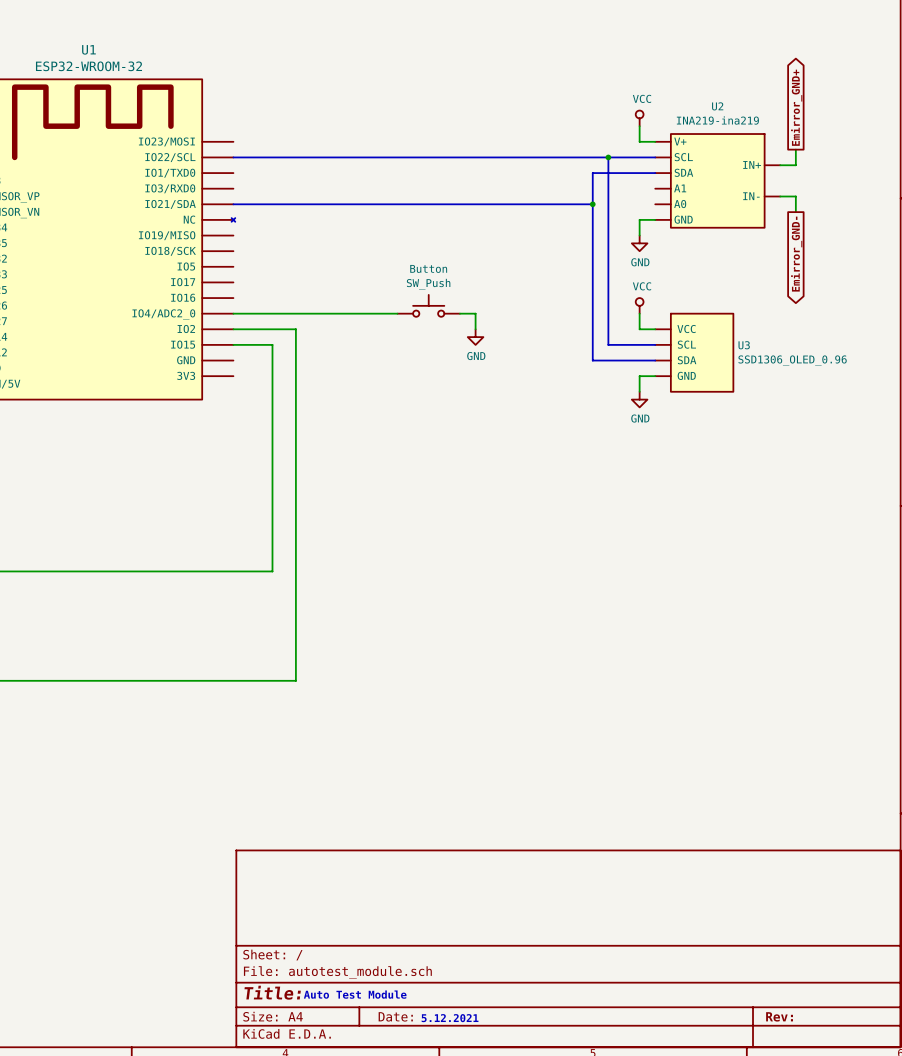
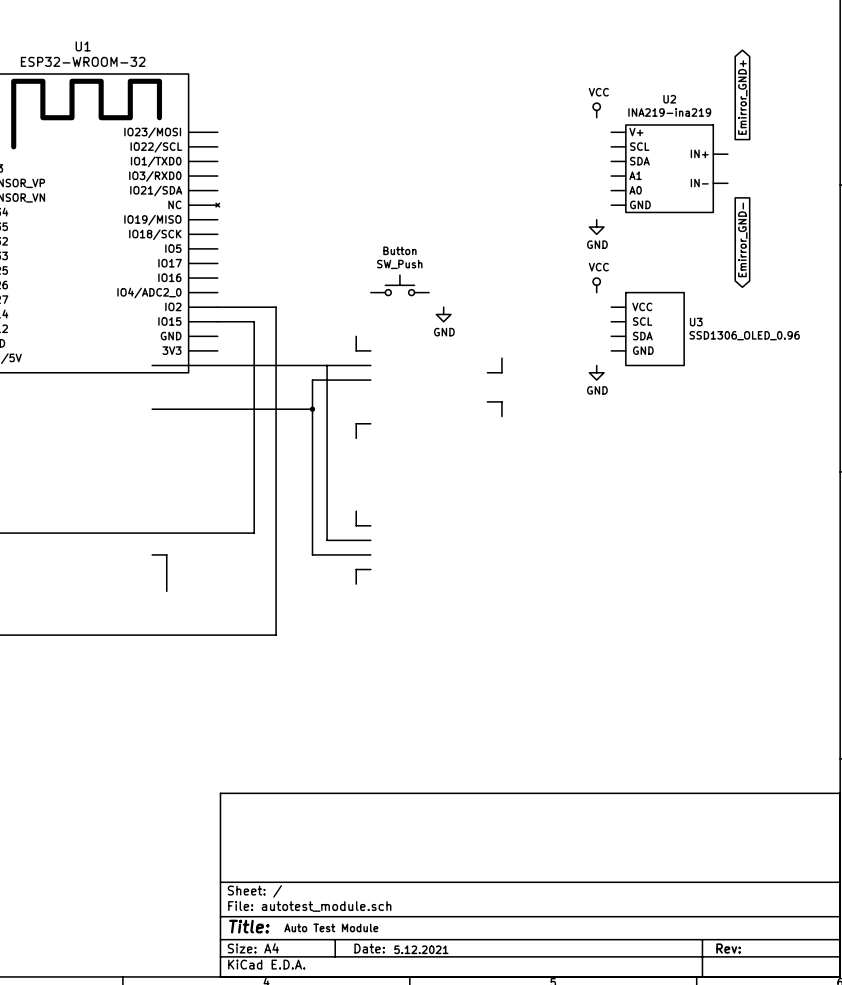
wire: (639, 126) (639, 141) (655, 141) -> none
wire: (795, 149) (795, 165) (780, 165) -> none
bus: (233, 157) (655, 157) -> none
bus: (608, 157) (608, 344) (655, 344) -> none
junction: (608, 157) -> none
bus: (655, 173) (592, 173) (592, 360) (655, 360) -> none
wire: (780, 196) (795, 196) (795, 212) -> none
bus: (233, 204) (592, 204) -> none
junction: (592, 204) -> none
wire: (655, 219) (639, 219) (639, 235) -> none
wire: (233, 313) (397, 313) -> none
wire: (459, 313) (475, 313) (475, 329) -> (487, 401) (501, 401) (501, 416)
wire: (639, 313) (639, 329) (655, 329) -> none
wire: none -> (356, 336) (356, 350) (370, 350)
wire: (655, 376) (639, 376) (639, 391) -> none
wire: none -> (501, 358) (501, 372) (487, 372)
bus: none -> (152, 365) (370, 365)
bus: none -> (327, 365) (327, 540) (370, 540)
bus: none -> (370, 380) (312, 380) (312, 554) (370, 554)
bus: none -> (152, 409) (312, 409)
junction: none -> (312, 409)
wire: none -> (370, 423) (356, 423) (356, 438)
wire: none -> (356, 511) (356, 525) (370, 525)
wire: none -> (152, 554) (166, 554) (166, 591)
wire: none -> (370, 569) (356, 569) (356, 584)

